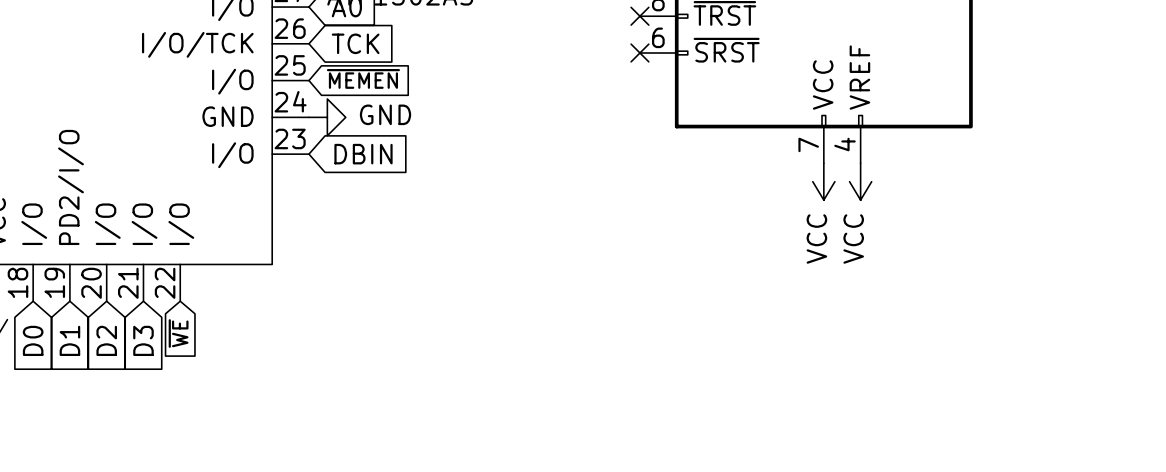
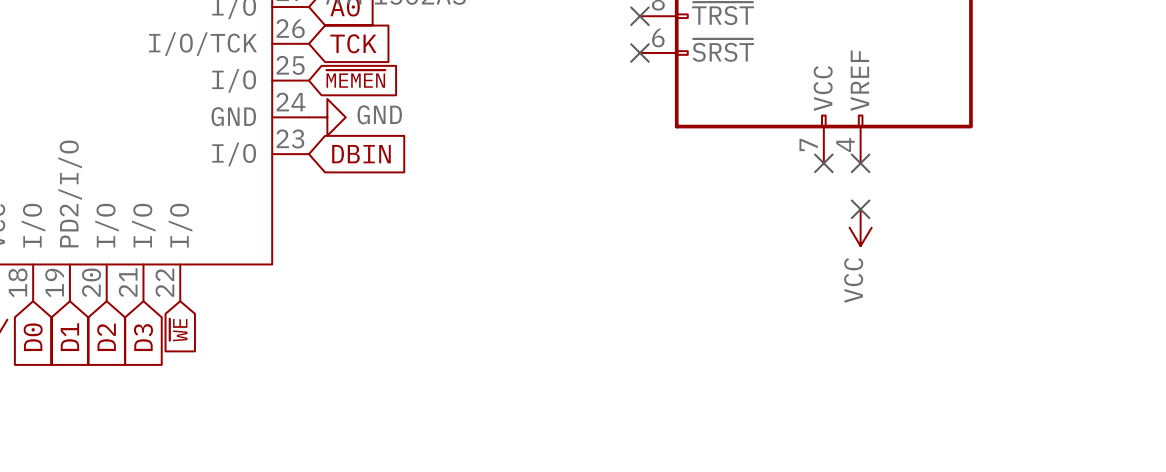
no-connect mark: none -> (823, 163)
no-connect mark: none -> (860, 163)
power symbol: VCC (823, 181) -> none
power symbol: VCC (860, 181) -> none
no-connect mark: none -> (860, 209)
power symbol: none -> VCC (860, 227)

